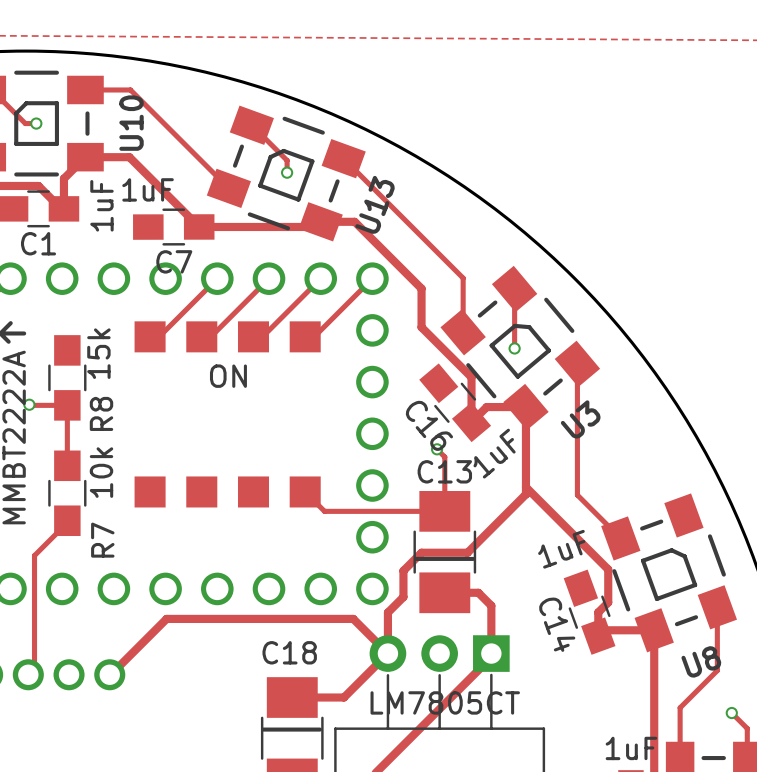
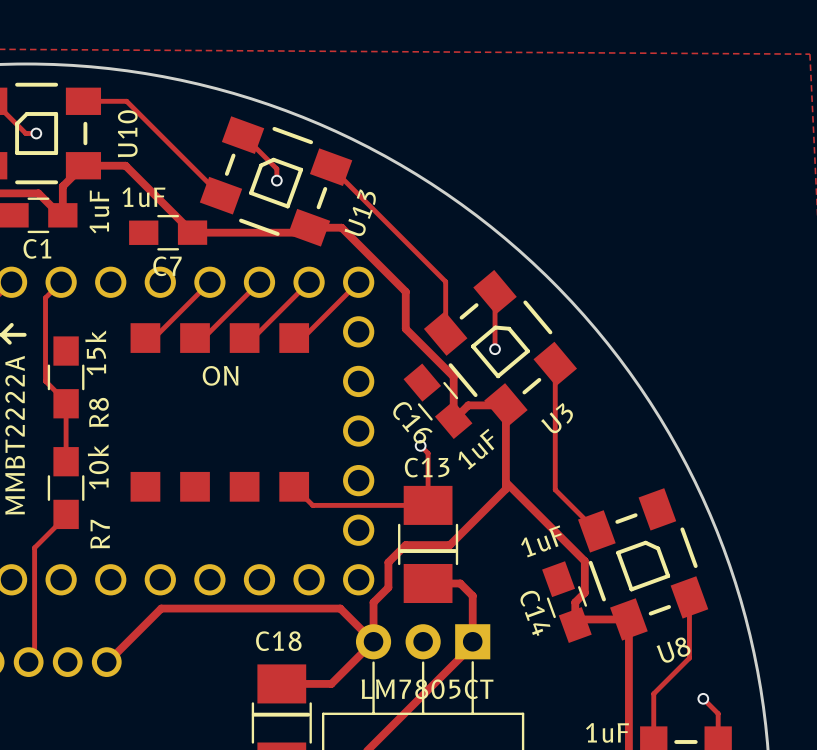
track: (29, 404) (67, 405) -> (58, 285) (45, 297) (45, 381) (66, 403)
via: (29, 404) -> none

